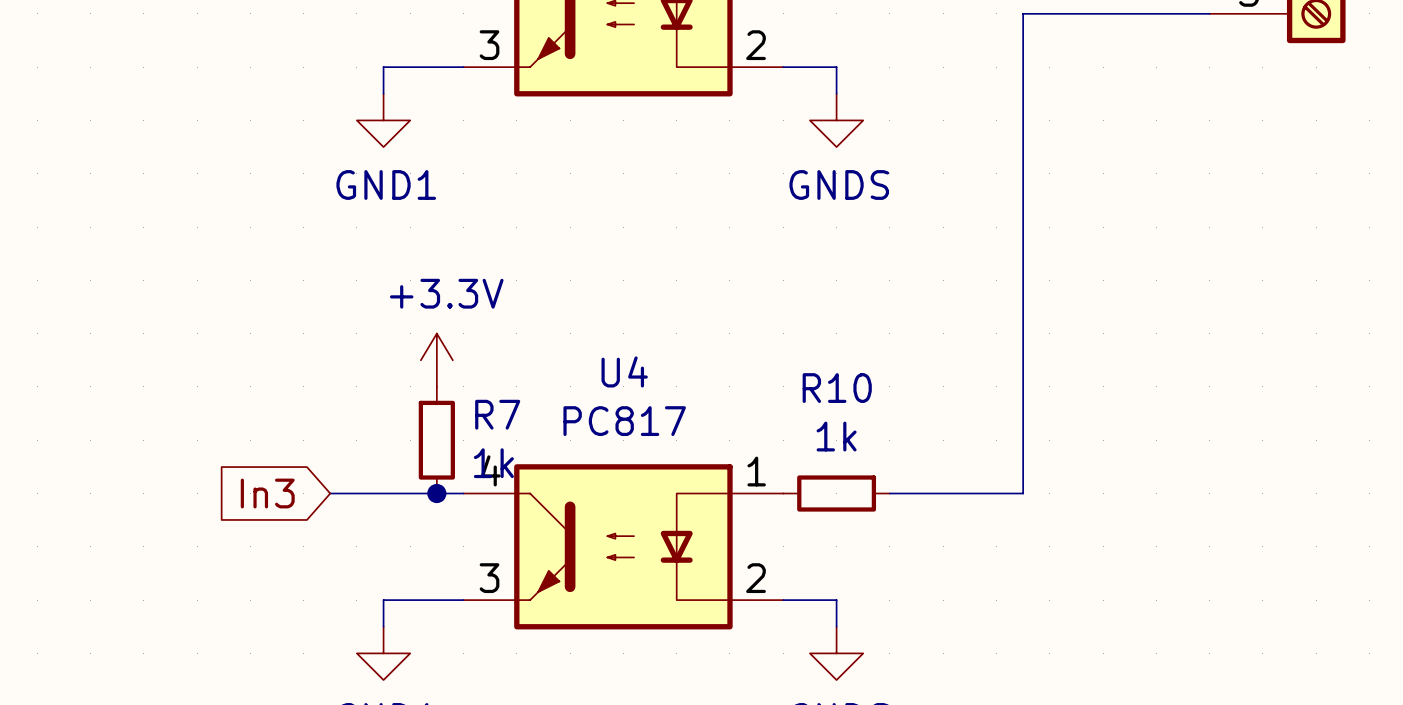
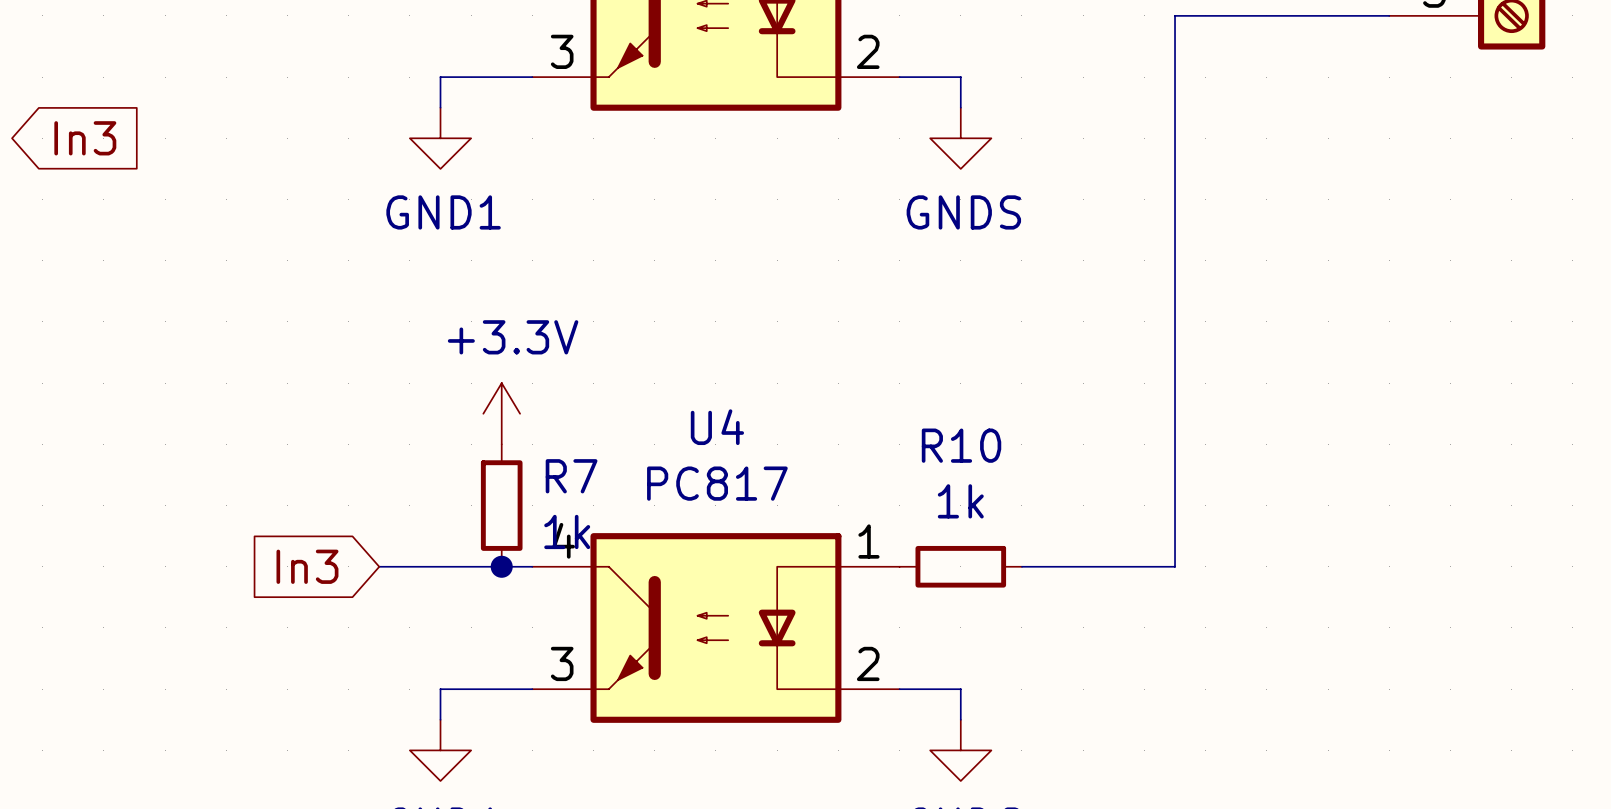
global label: none -> In3 (85, 138)

